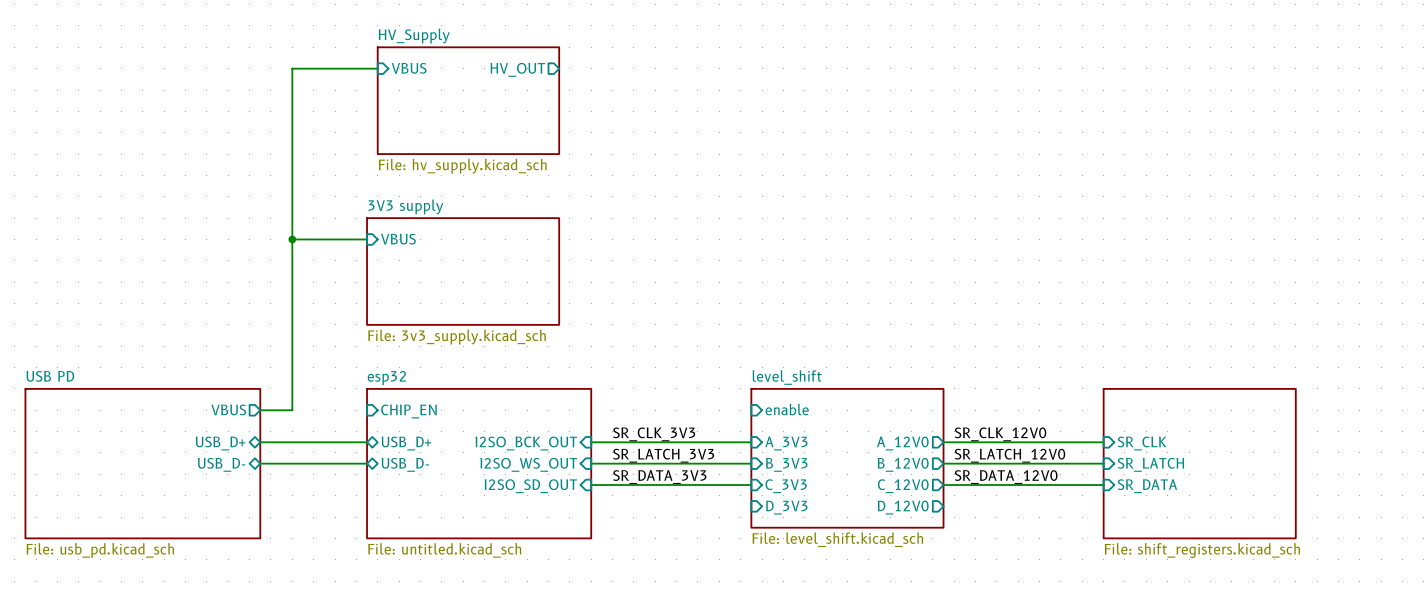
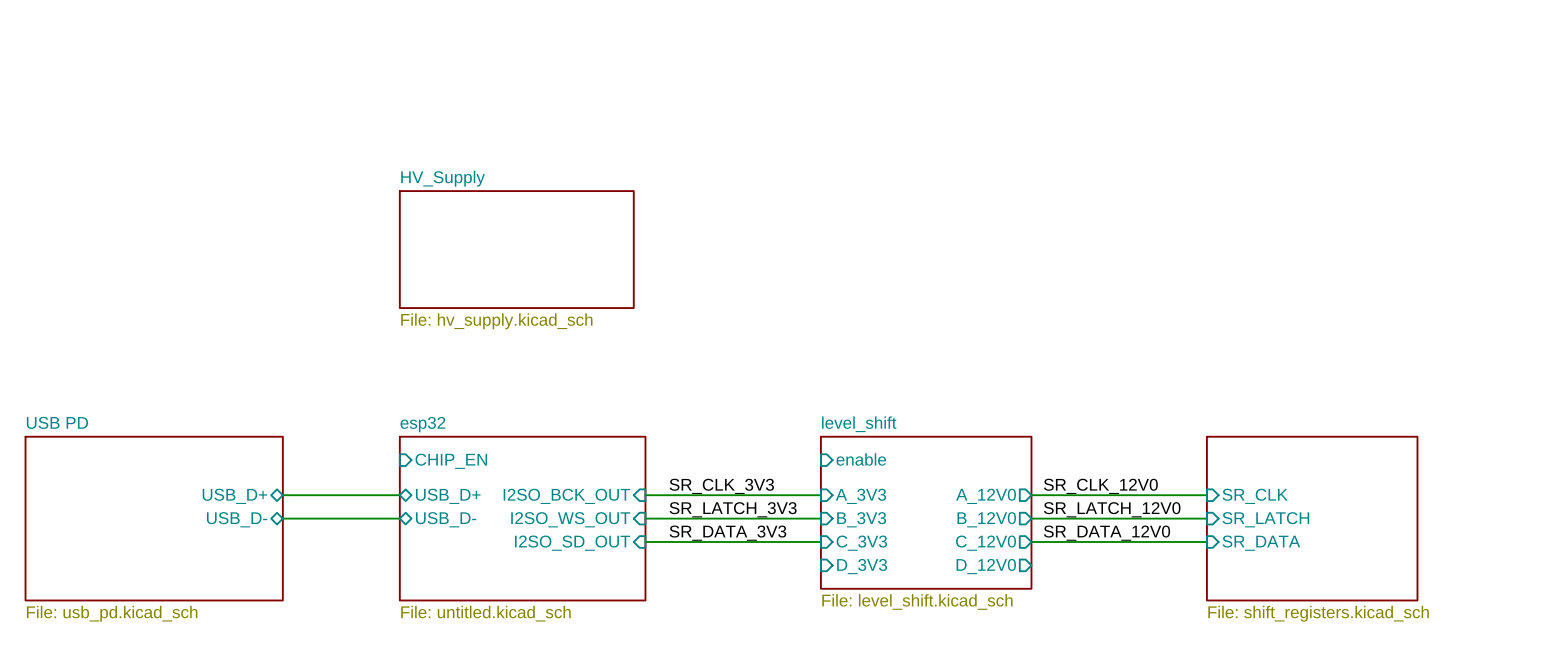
wire: (377, 68) (292, 68) (292, 410) (260, 410) -> none
sheet pin: VBUS (409, 68) -> none
sheet pin: HV_OUT (517, 69) -> none
sheet HV_Supply: File: hv_supply.kicad_sch (468, 100) -> none
sheet HV_Supply: none -> File: hv_supply.kicad_sch (516, 249)
wire: (292, 239) (367, 239) -> none
junction: (292, 239) -> none
sheet pin: VBUS (398, 239) -> none
sheet 3V3 supply: File: 3v3_supply.kicad_sch (463, 271) -> none
sheet pin: VBUS (228, 409) -> none

